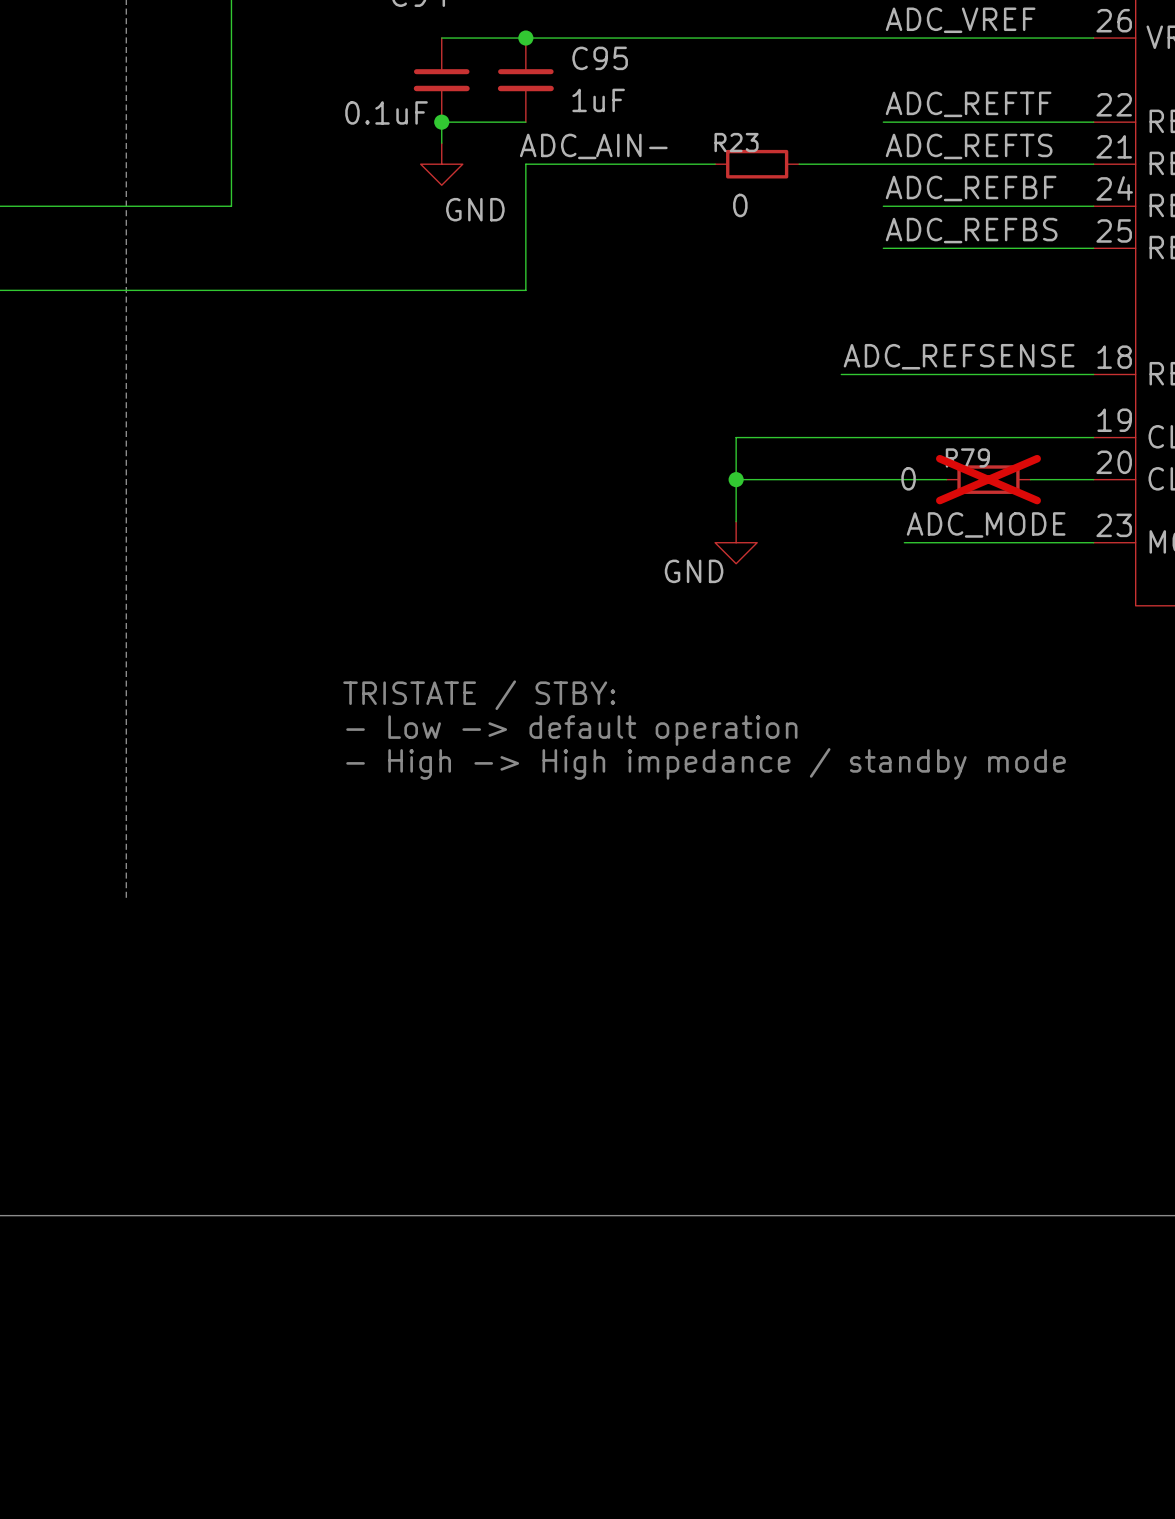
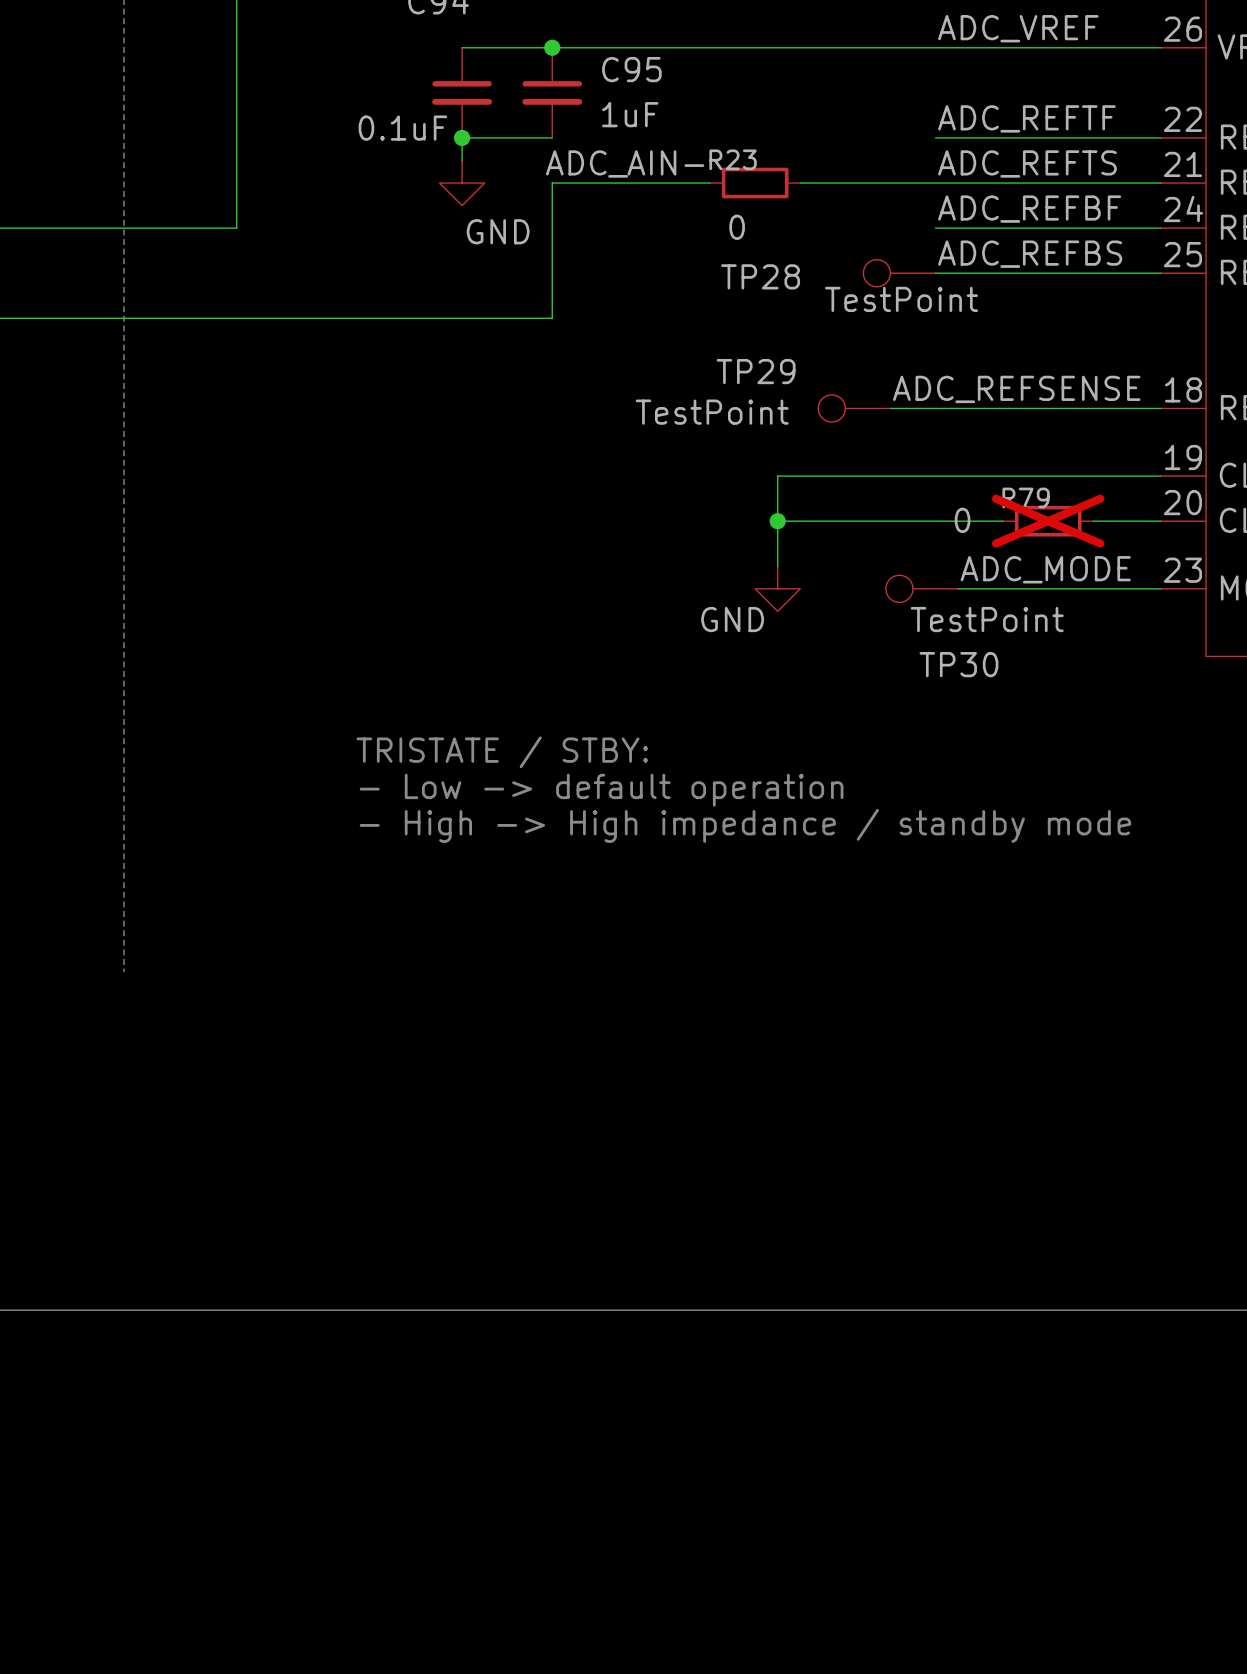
wire: (673, 164) (715, 164) -> (800, 183) (845, 183)
R23 position: (757, 164) -> (755, 183)
TP28: none -> TestPoint (899, 273)
TP29: none -> TestPoint (854, 408)
TP30: none -> TestPoint (921, 588)

